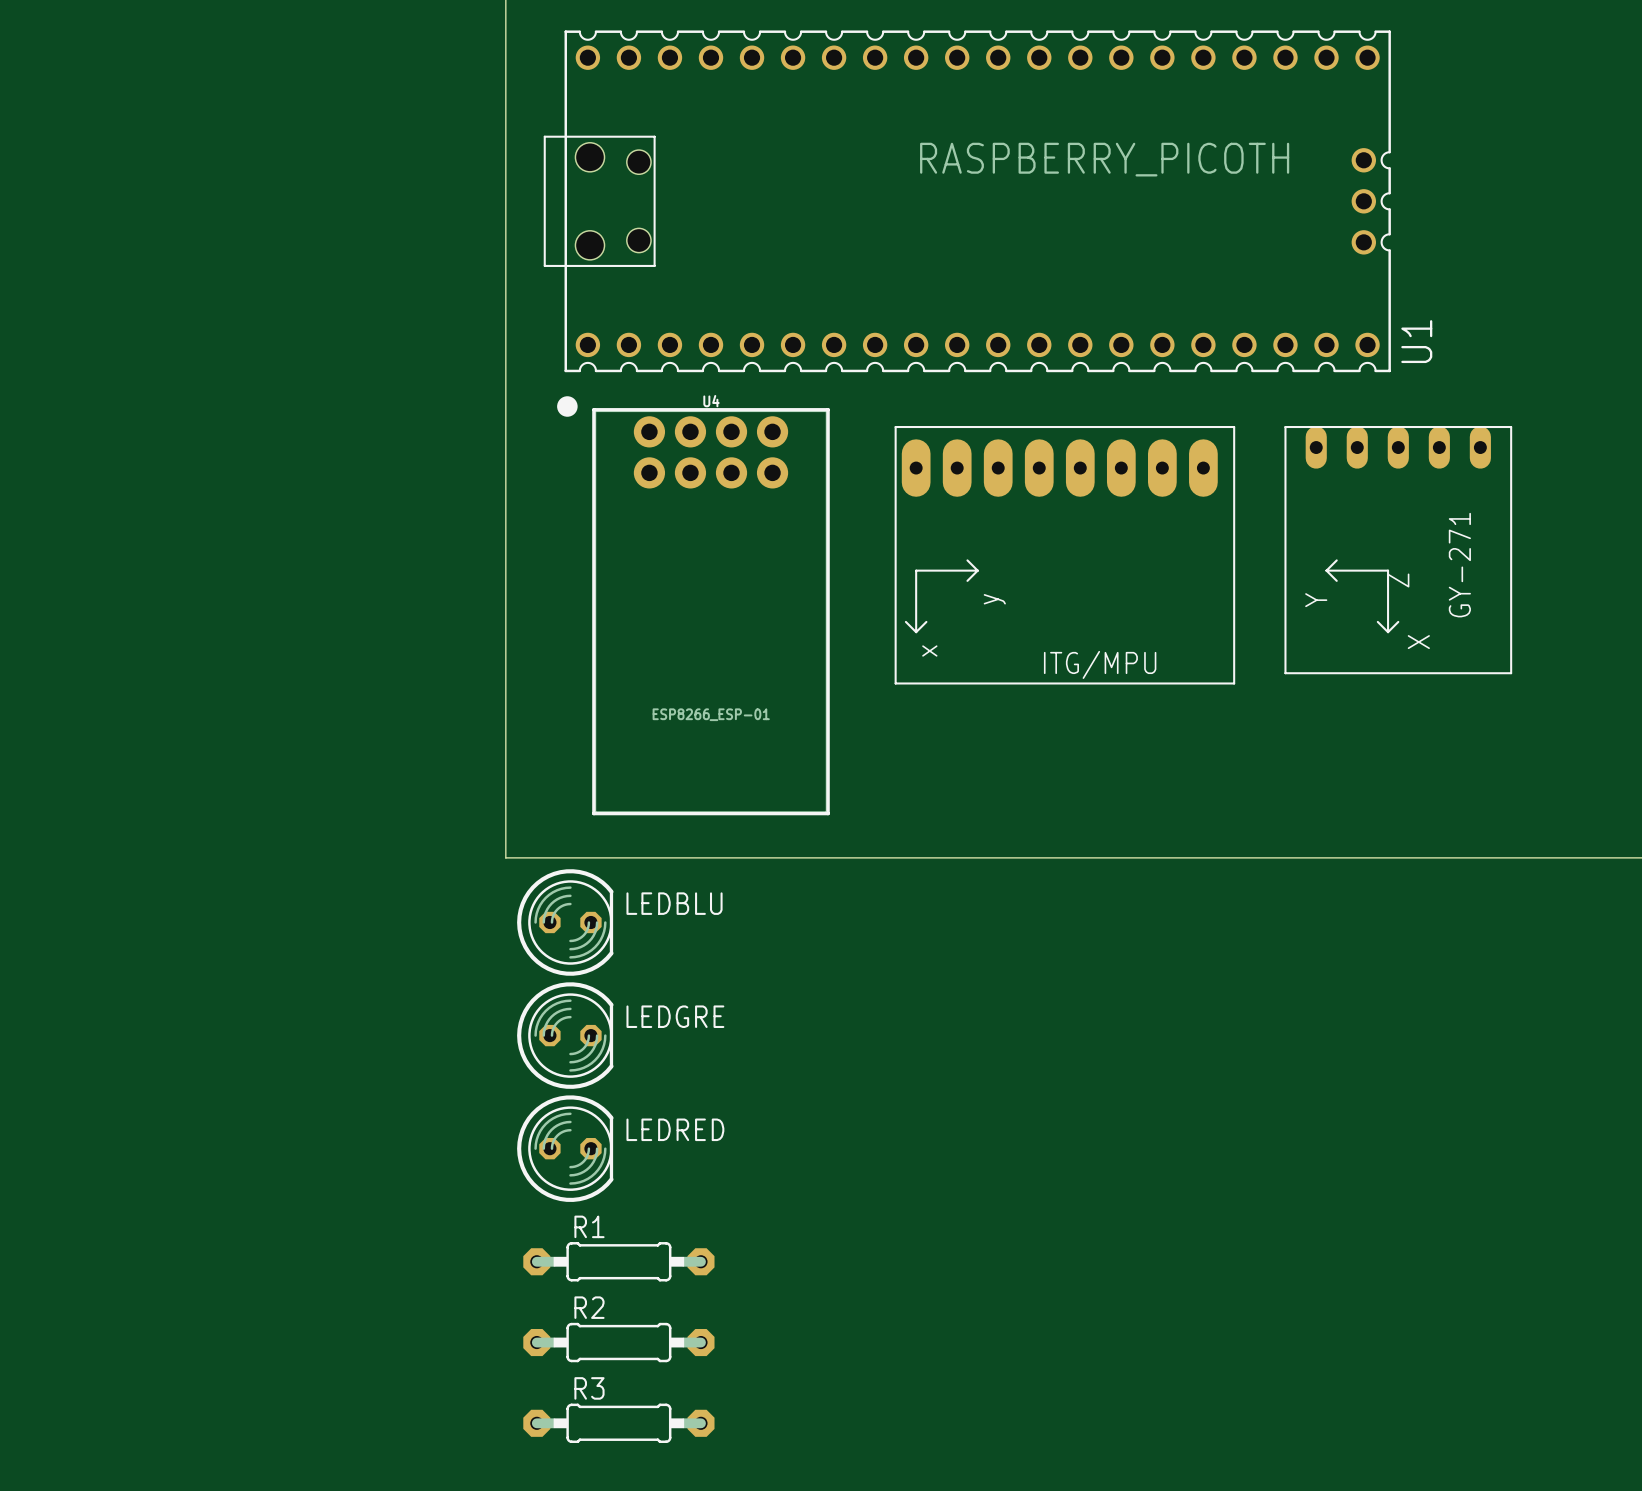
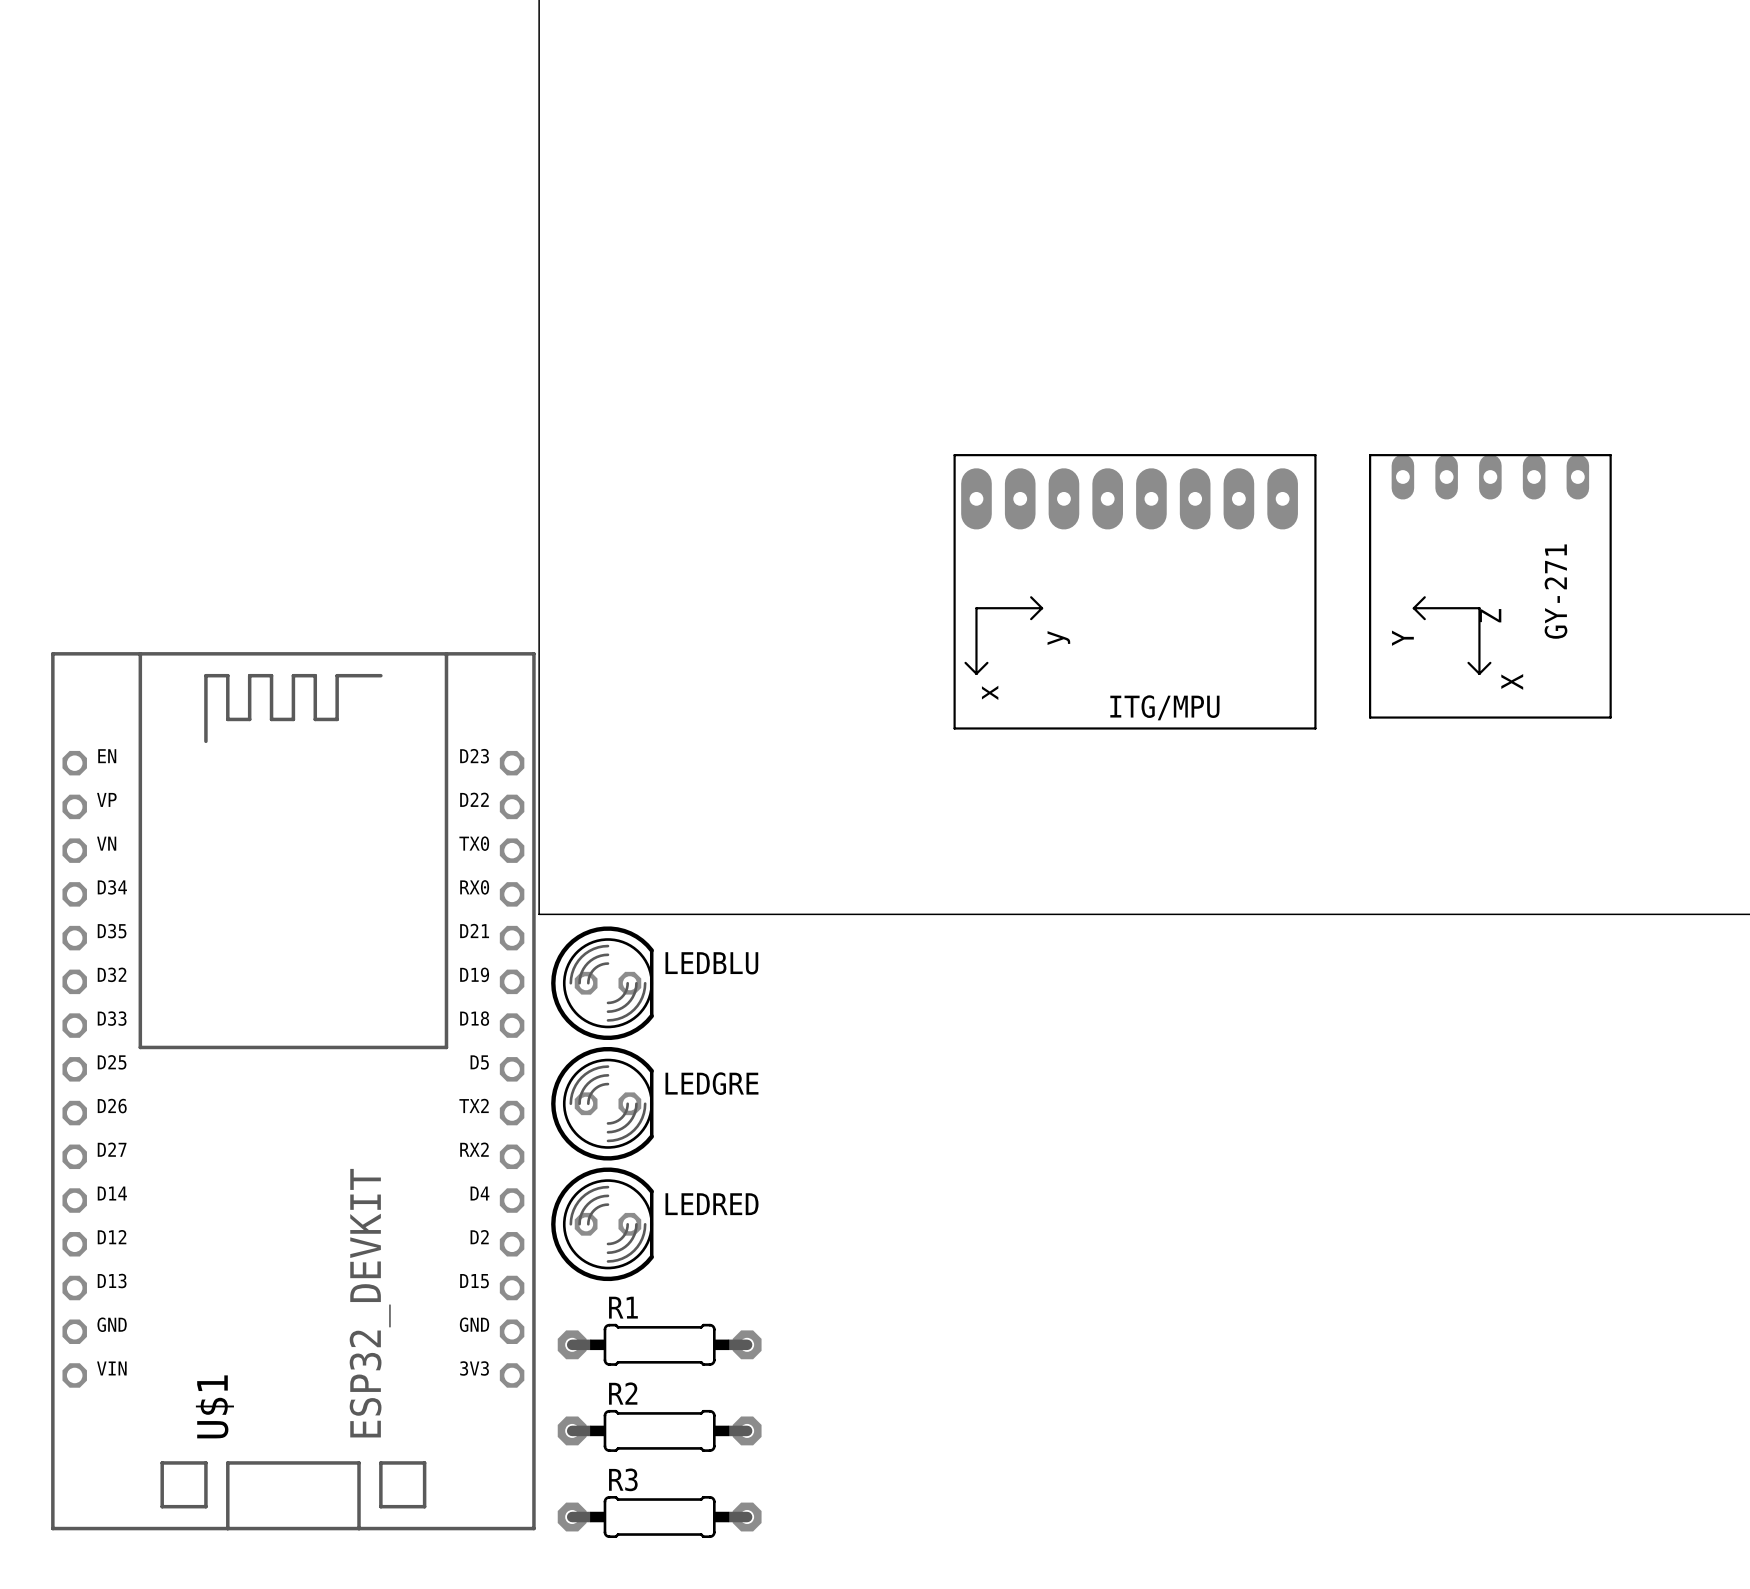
U1: RASPBERRY_PICOTH (967, 223) -> none
U4: ESP8266_ESP-01 (710, 611) -> none
U$1: none -> ESP32_DEVKIT (293, 1091)

